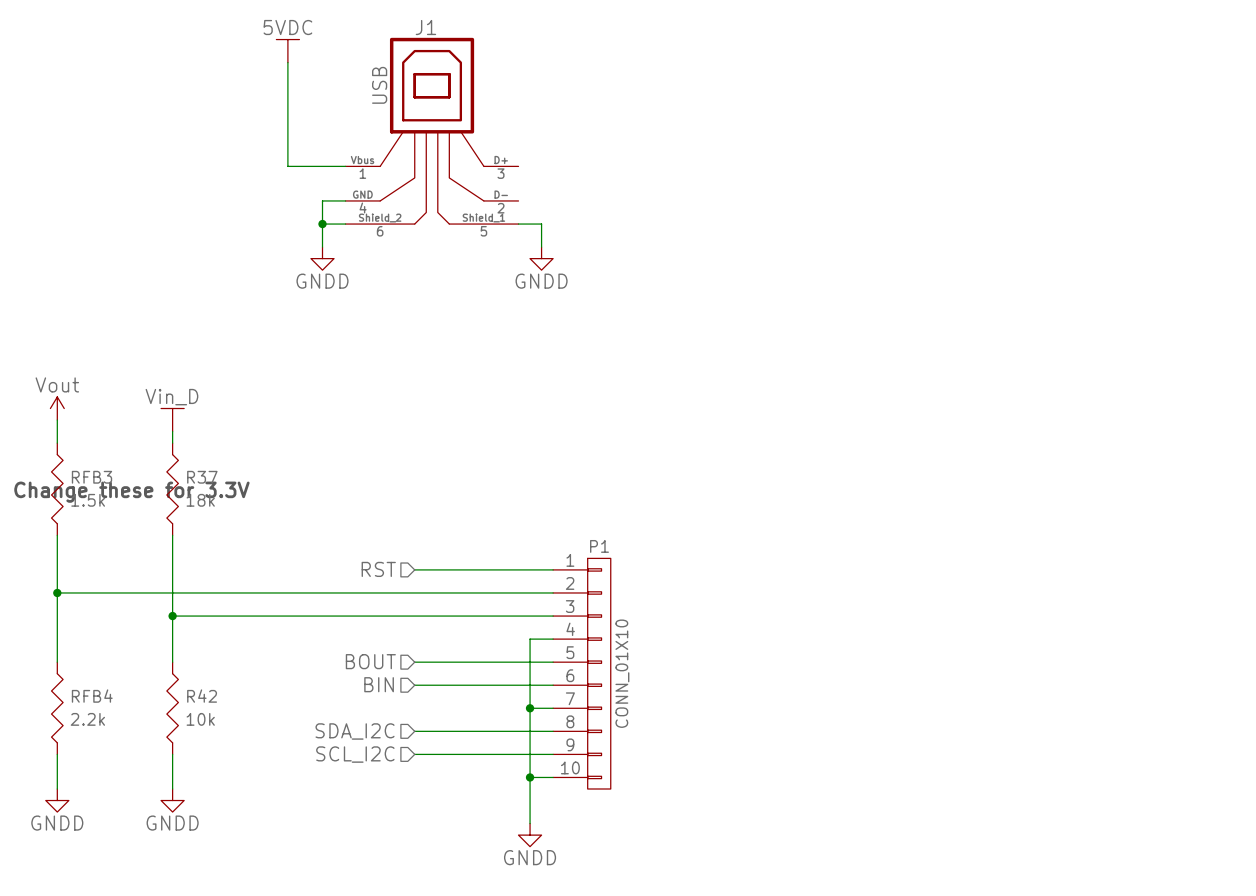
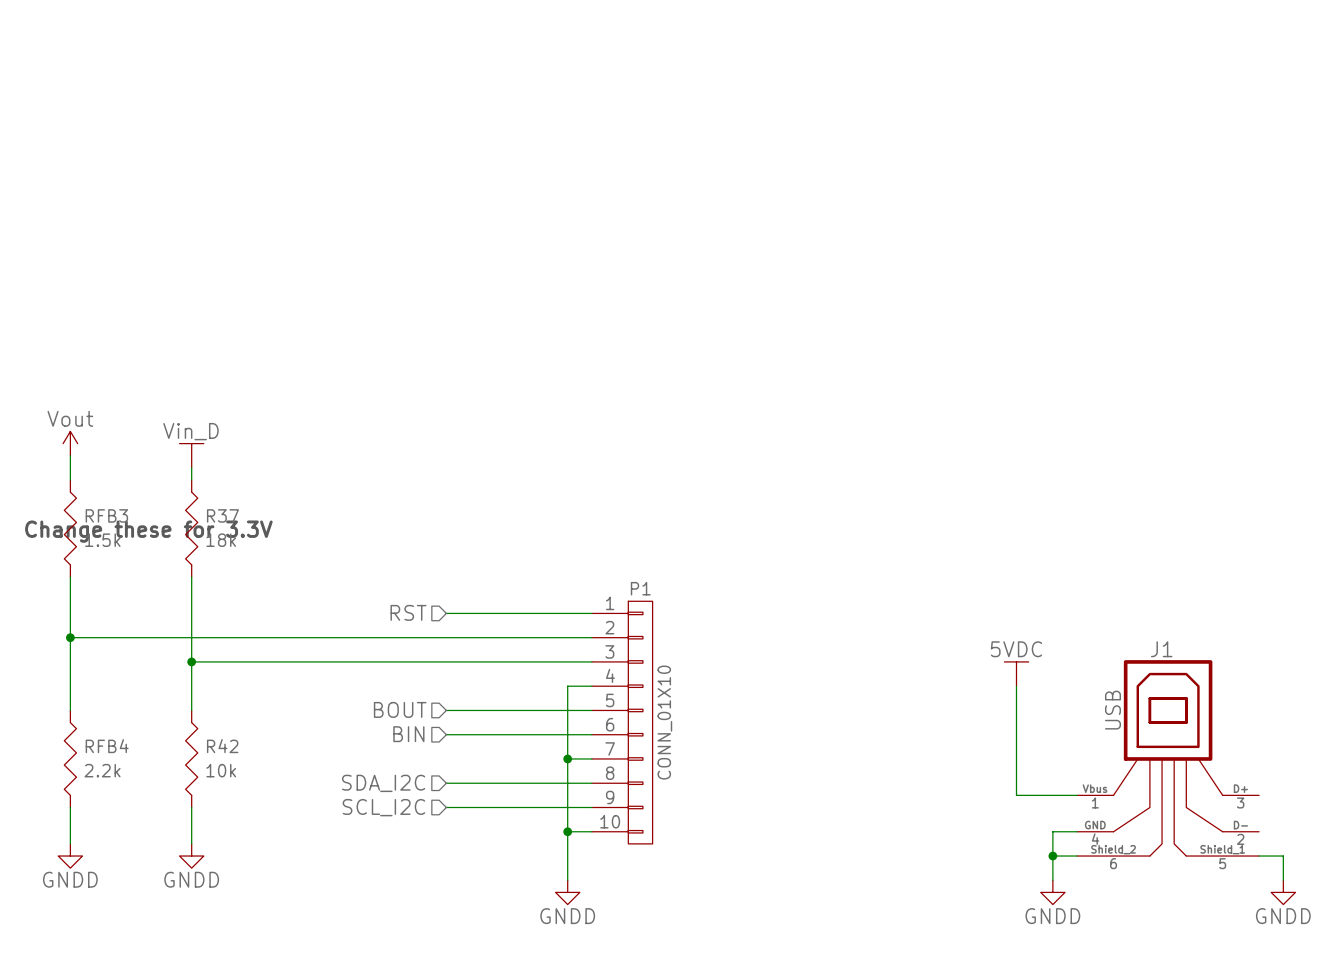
power symbol: 5VDC (287, 51) -> none
wire: (287, 62) (287, 166) (345, 166) -> none
J1 position: (432, 130) -> (1168, 758)
wire: (345, 200) (322, 200) (322, 247) -> none
wire: (322, 224) (345, 224) -> none
junction: (322, 224) -> none
wire: (518, 224) (541, 224) (541, 247) -> none
power symbol: GNDD (322, 258) -> none
power symbol: GNDD (541, 258) -> none
power symbol: none -> 5VDC (1016, 674)
wire: none -> (1016, 686) (1016, 795) (1077, 795)
wire: none -> (1077, 831) (1052, 831) (1052, 880)
wire: none -> (1052, 856) (1077, 856)
junction: none -> (1052, 856)
wire: none -> (1259, 856) (1283, 856) (1283, 880)
power symbol: none -> GNDD (1052, 892)
power symbol: none -> GNDD (1283, 892)

